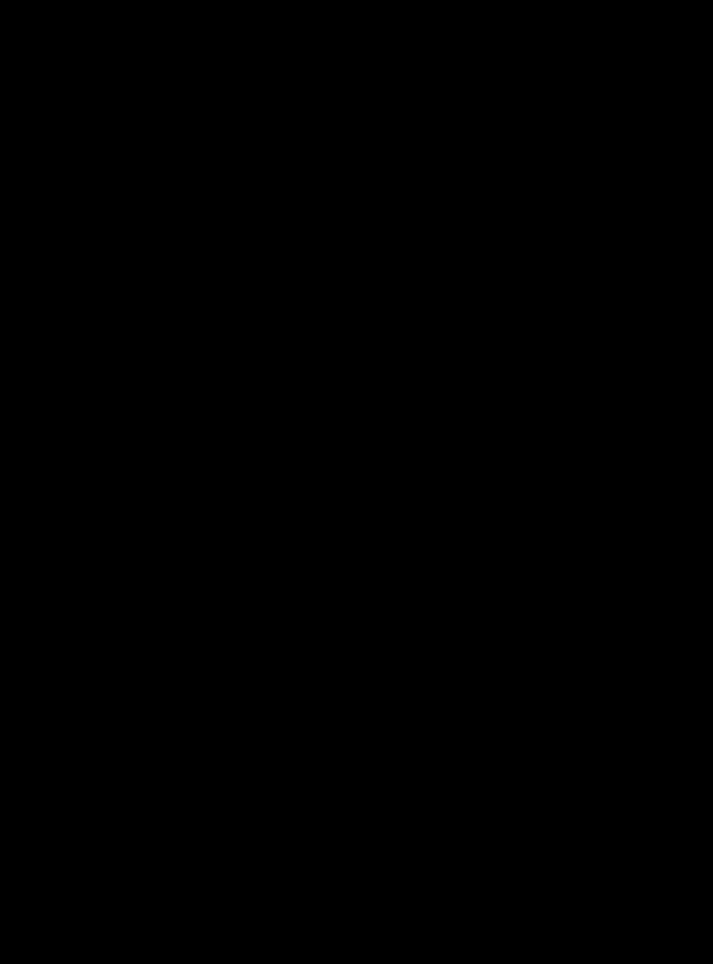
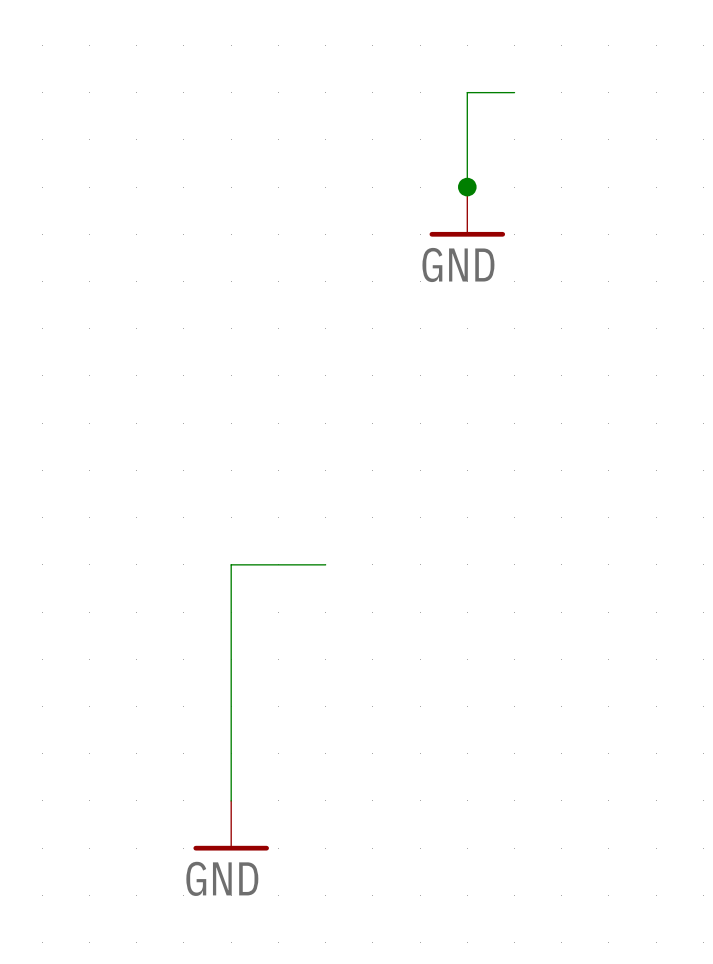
wire: none -> (514, 92) (467, 92) (467, 187)
junction: none -> (467, 187)
power symbol: none -> GND (467, 211)
wire: none -> (325, 564) (231, 564) (231, 800)
power symbol: none -> GND (231, 825)

